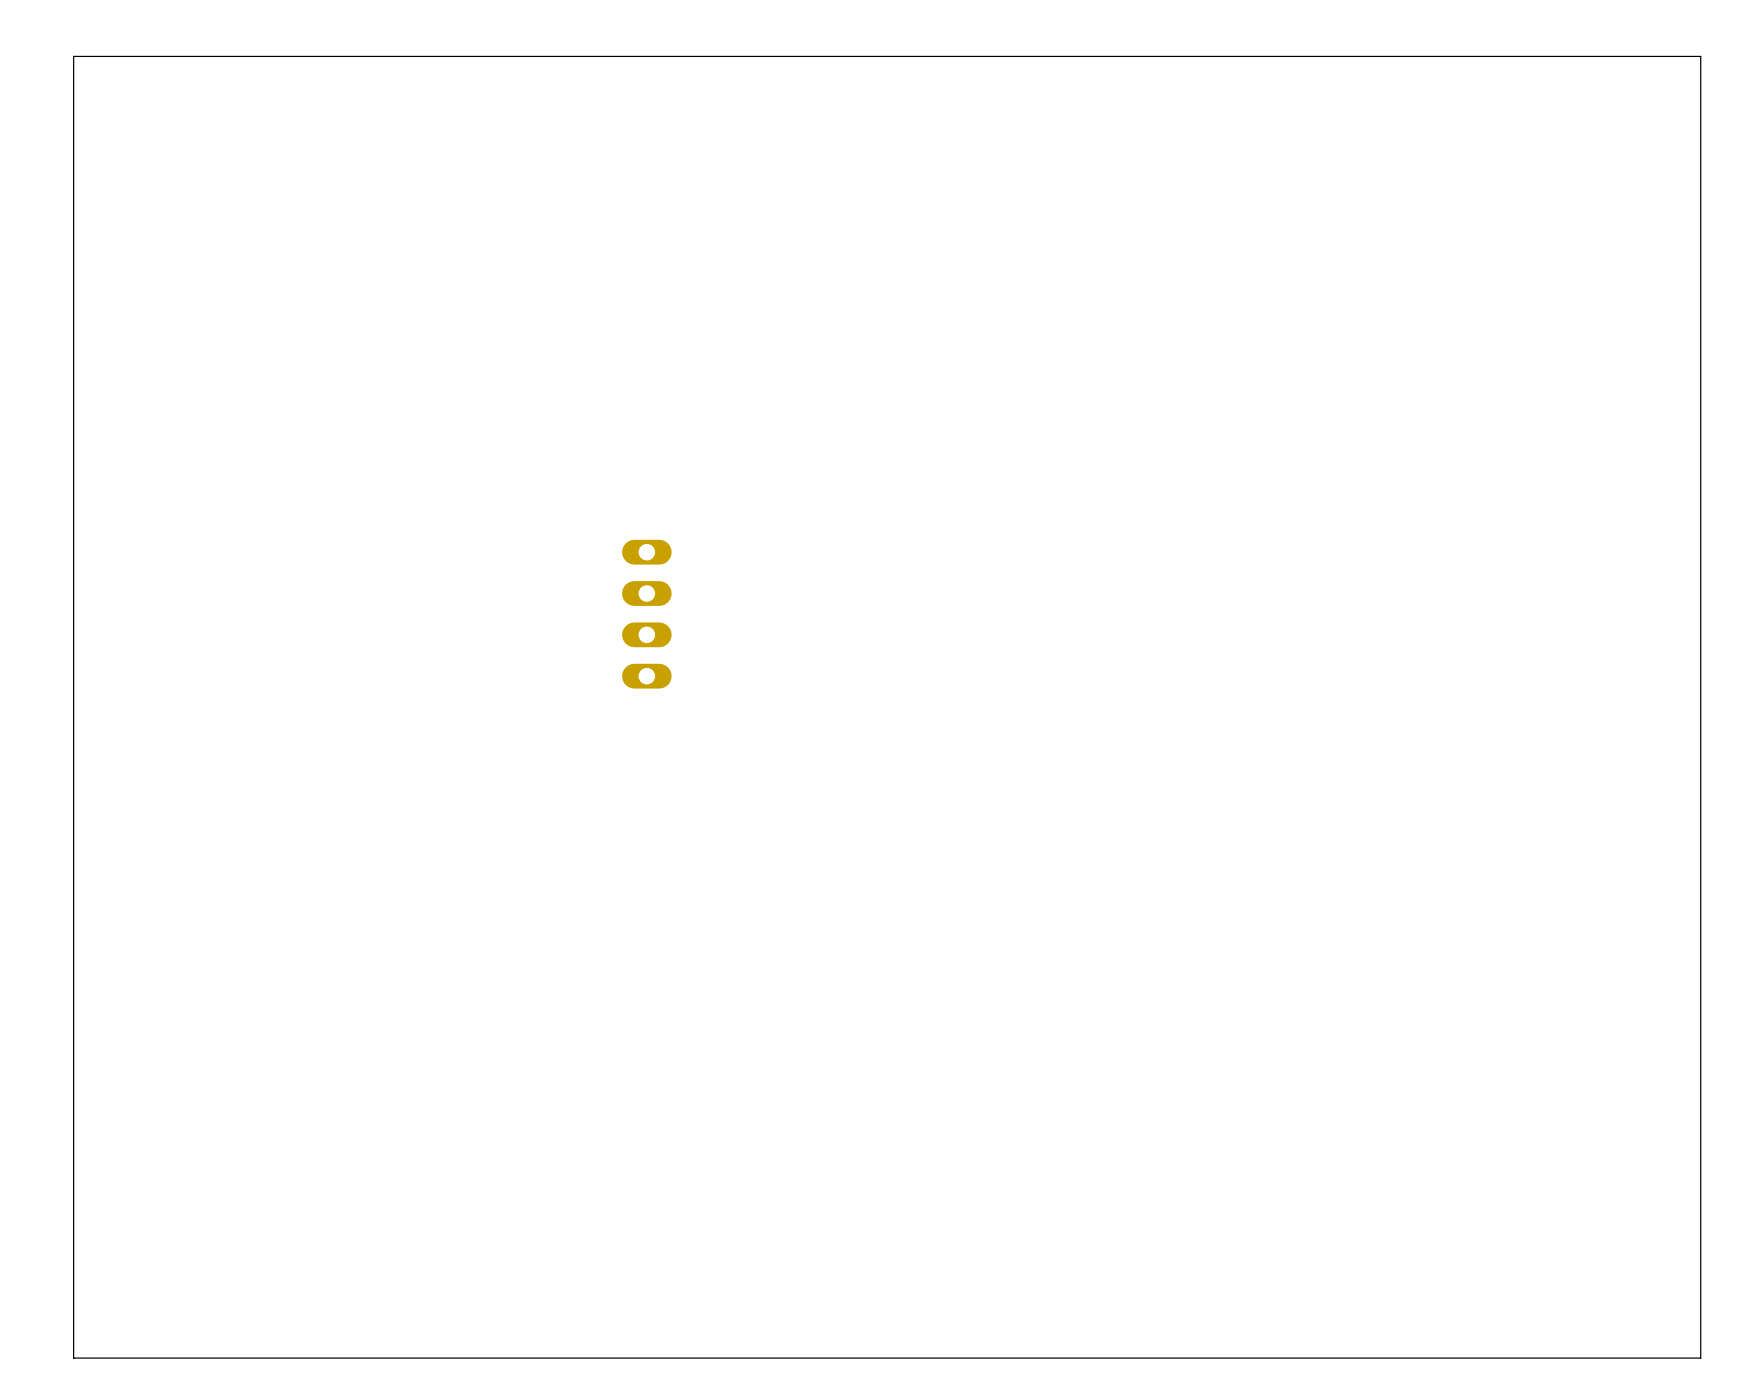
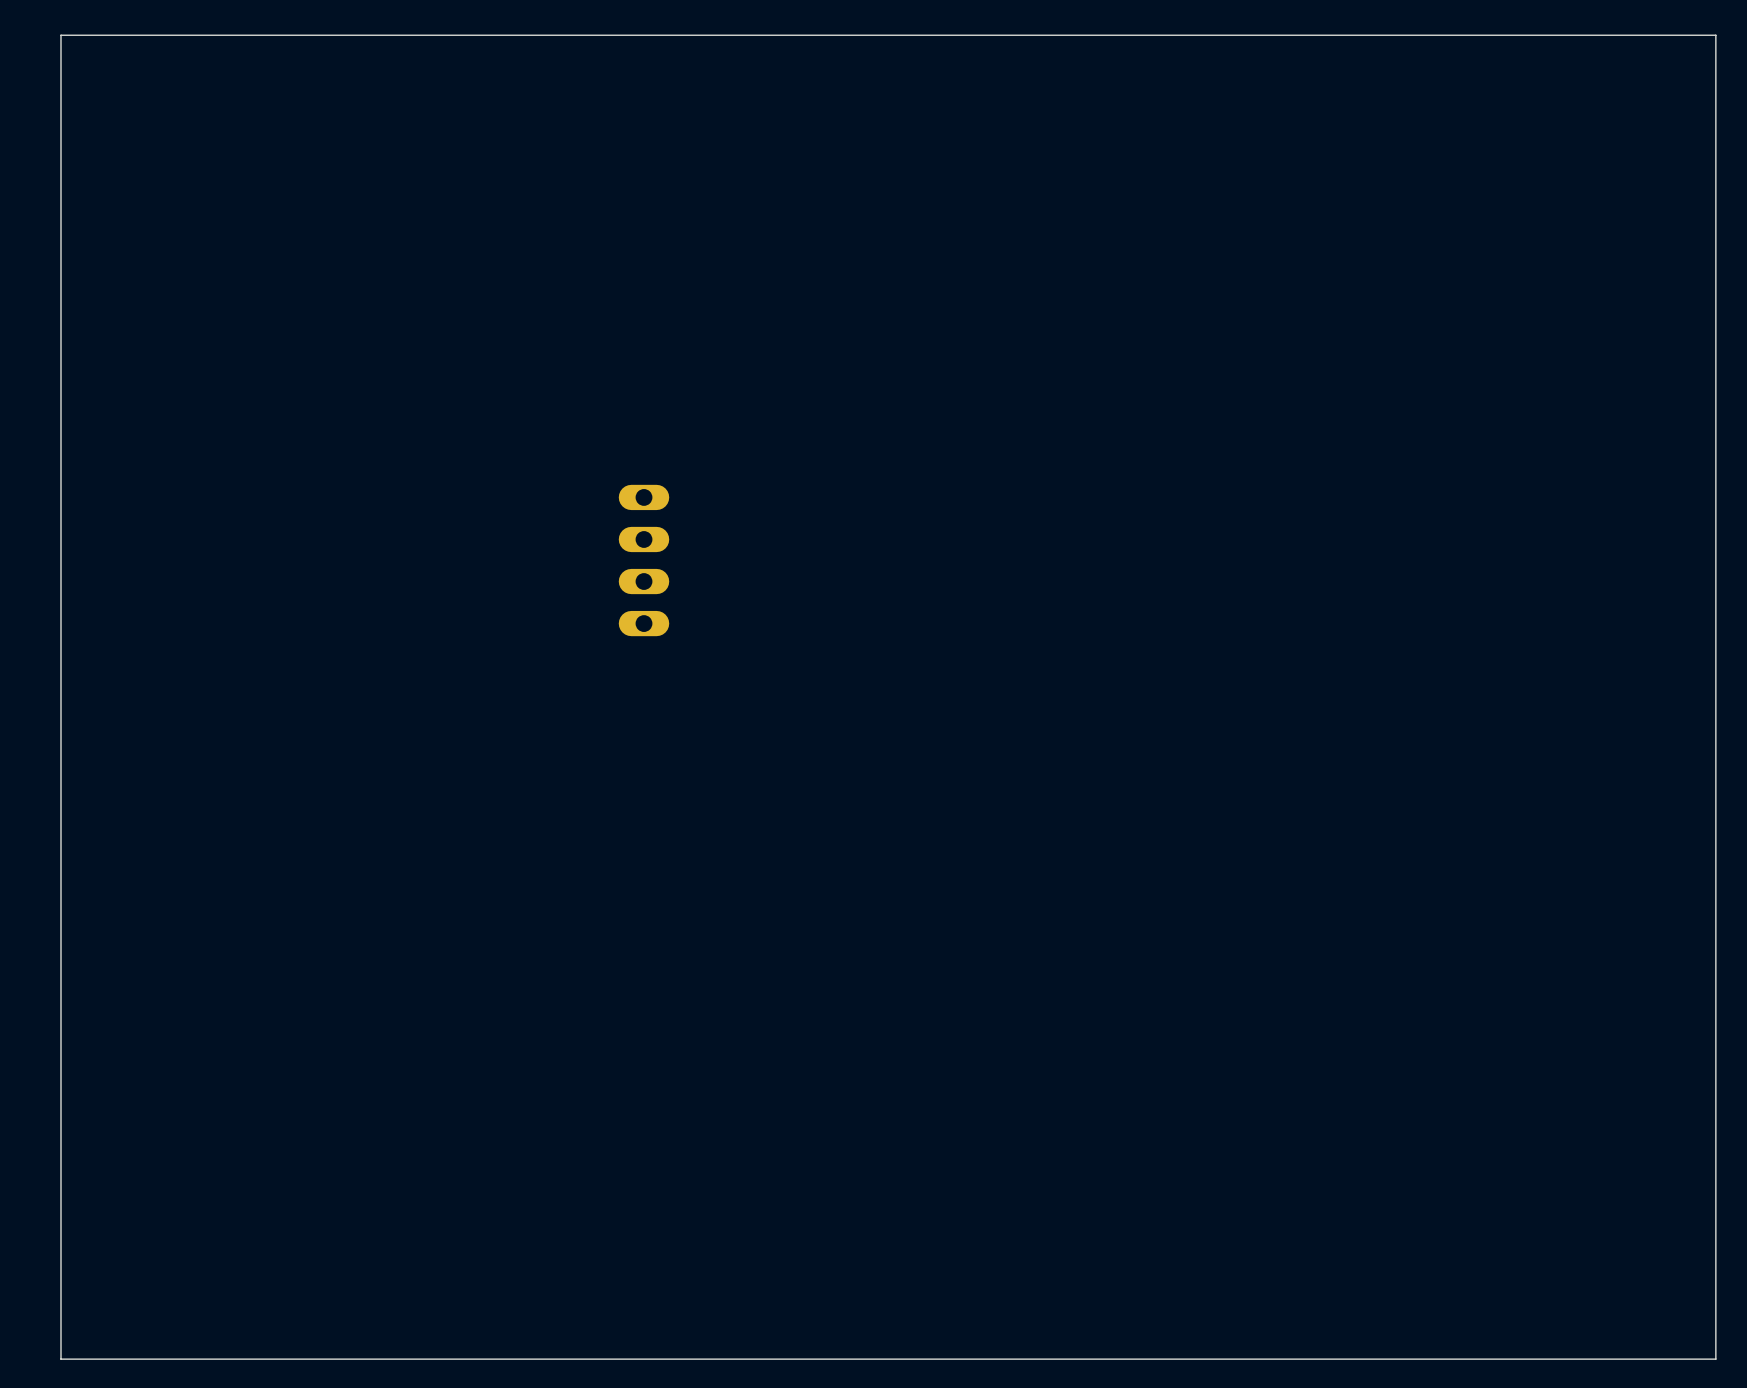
part position: (646, 614) -> (644, 560)

